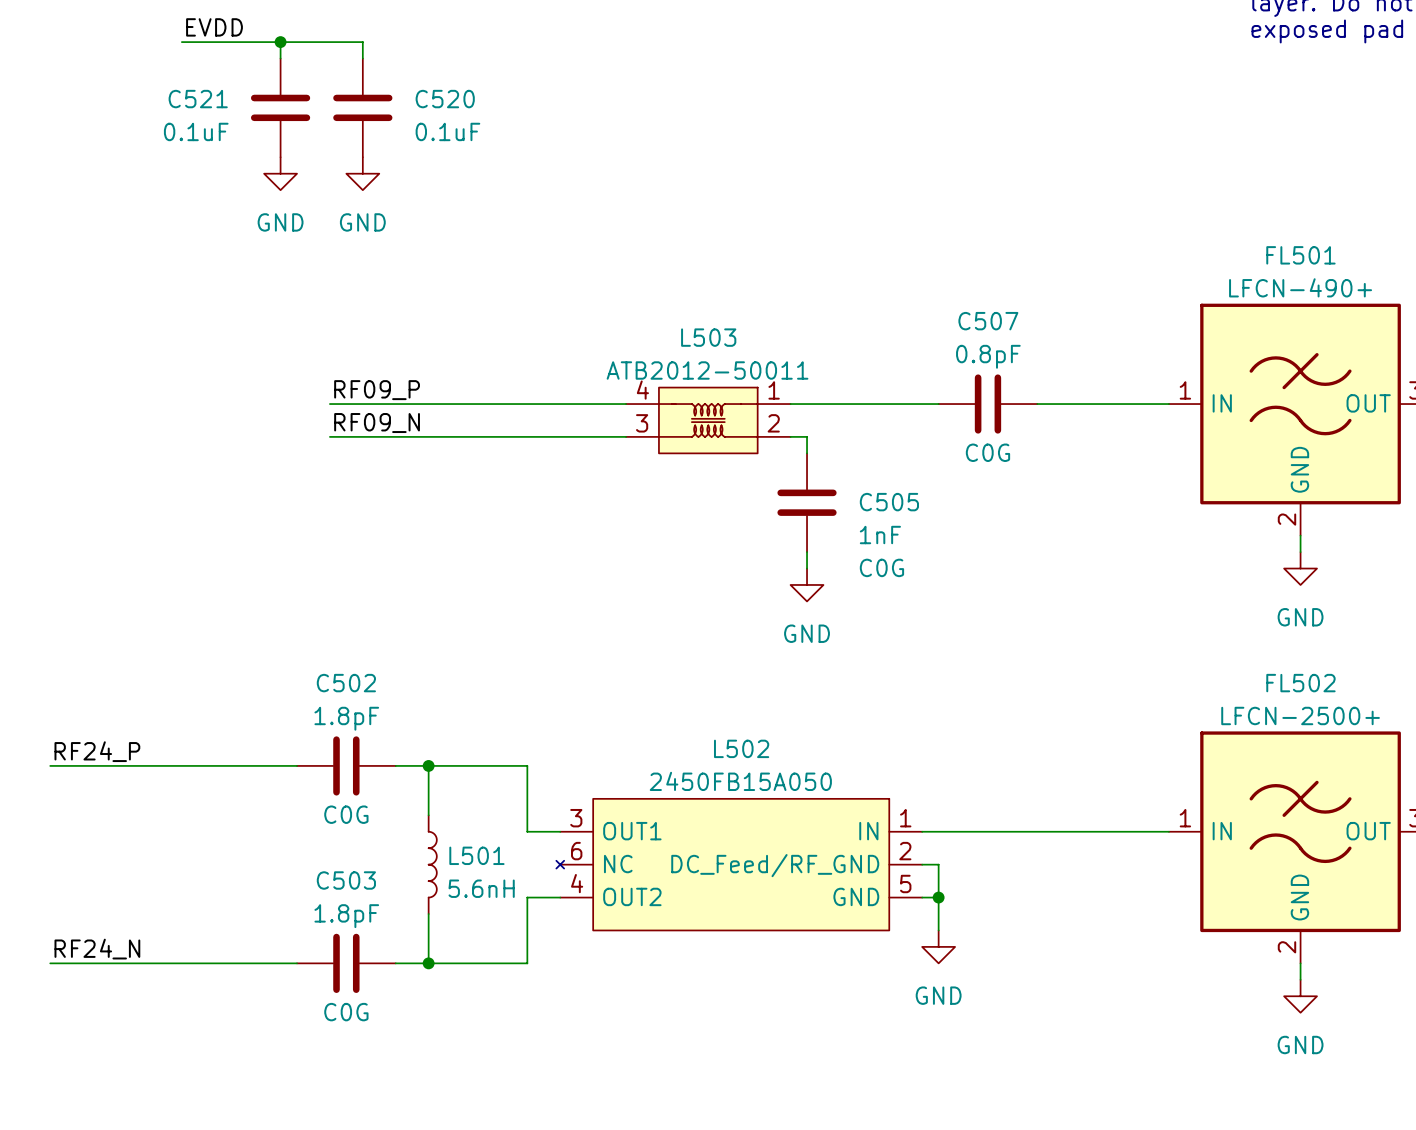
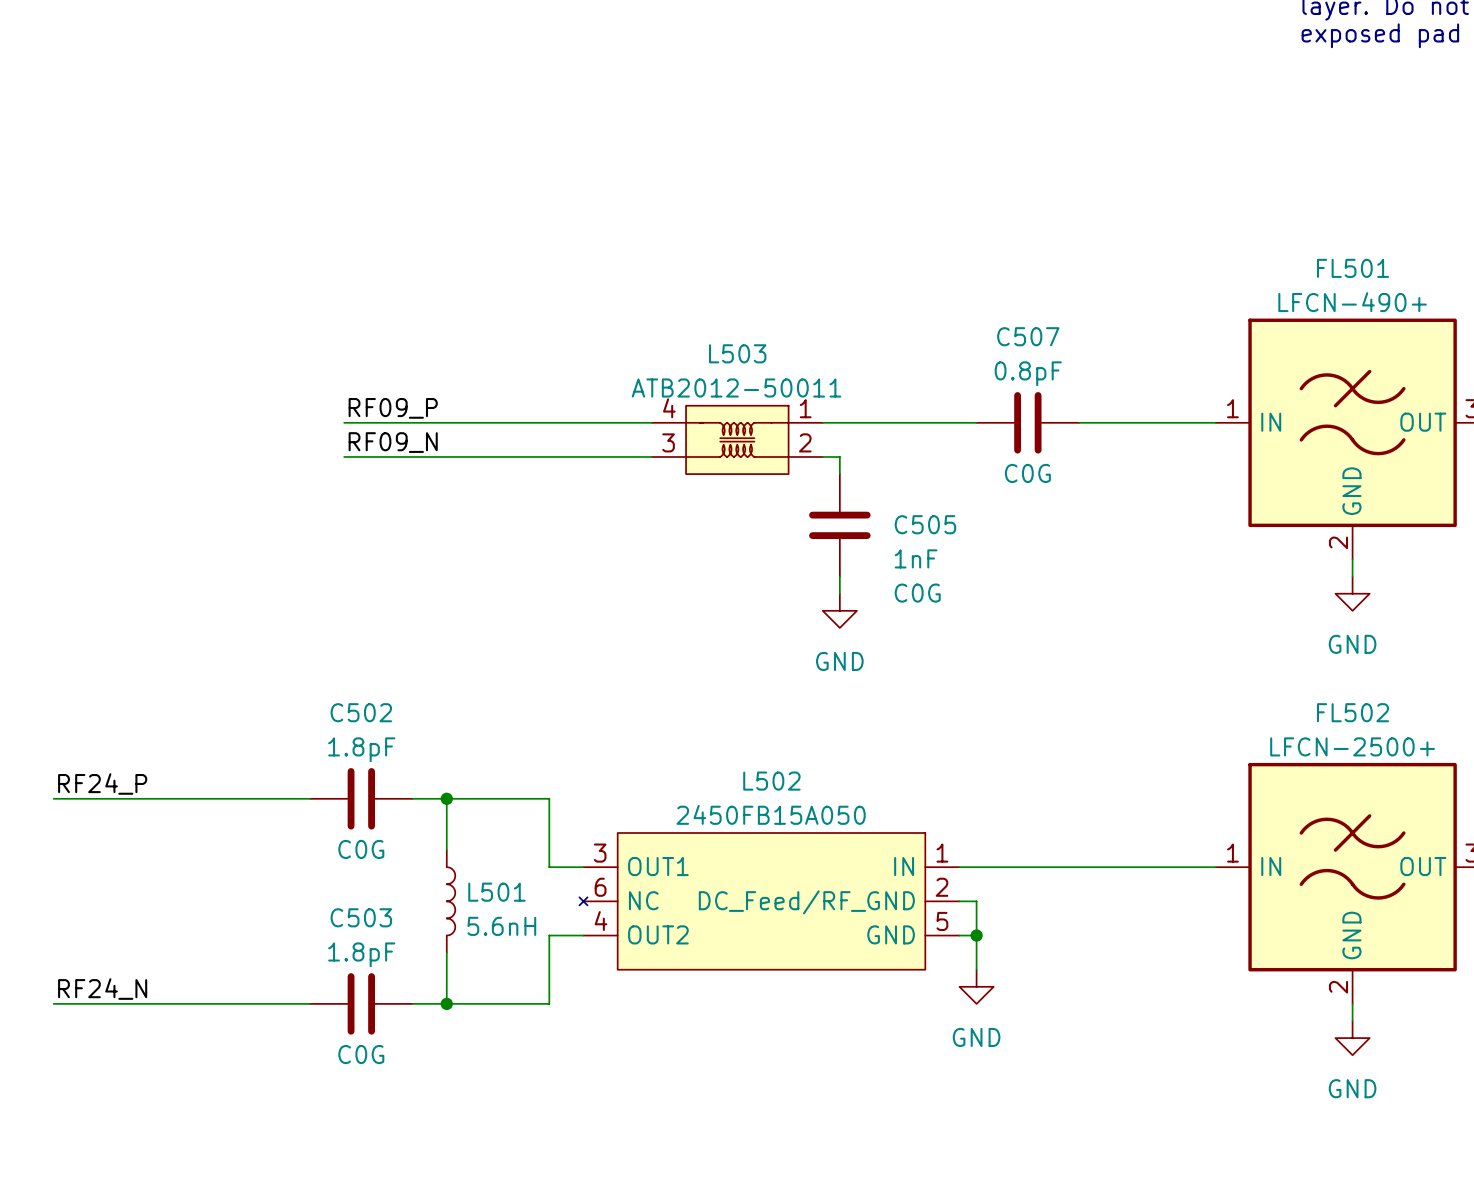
label: EVDD (214, 27) -> none
wire: (181, 42) (362, 42) (362, 58) -> none
wire: (280, 42) (280, 58) -> none
junction: (280, 42) -> none
C521: 0.1uF (280, 107) -> none
C520: 0.1uF (362, 107) -> none
power symbol: GND (280, 173) -> none
power symbol: GND (362, 173) -> none

